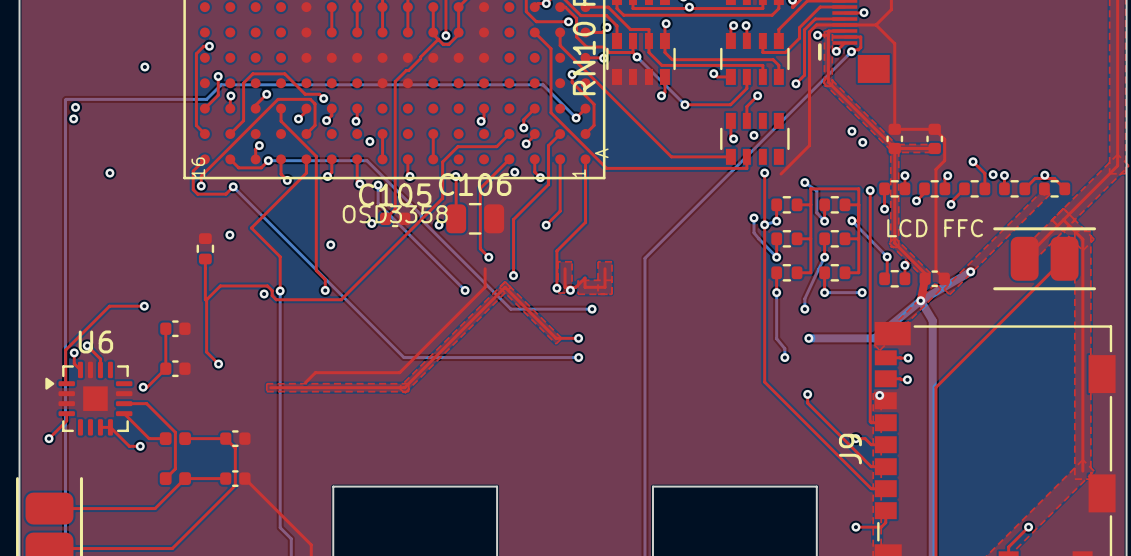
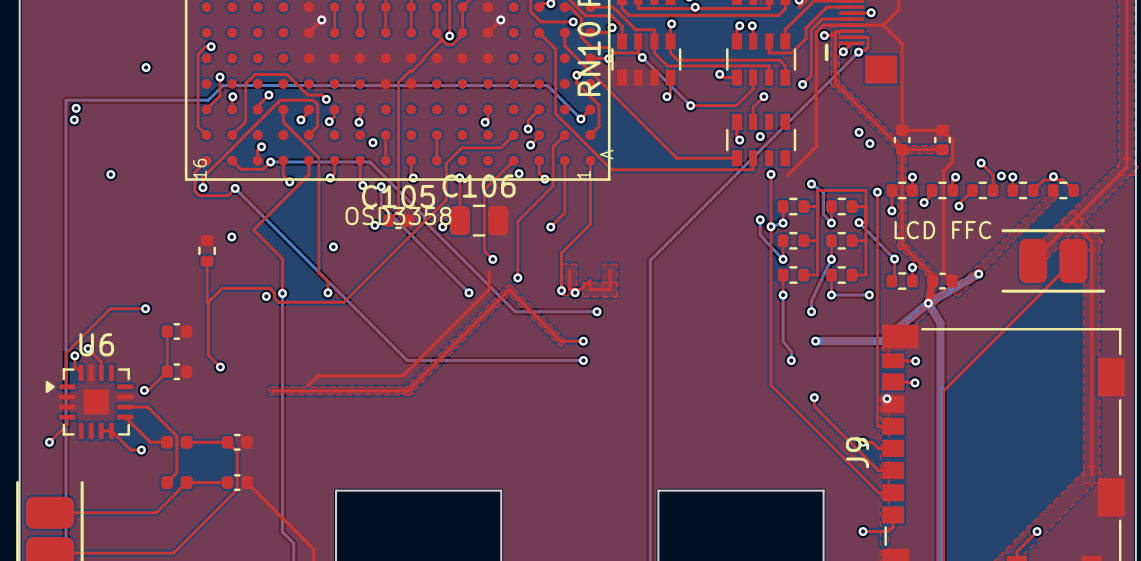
top track: none -> (321, 19) (308, 32)
via: none -> (321, 19)
top track: none -> (500, 19) (488, 32)
via: none -> (500, 19)

